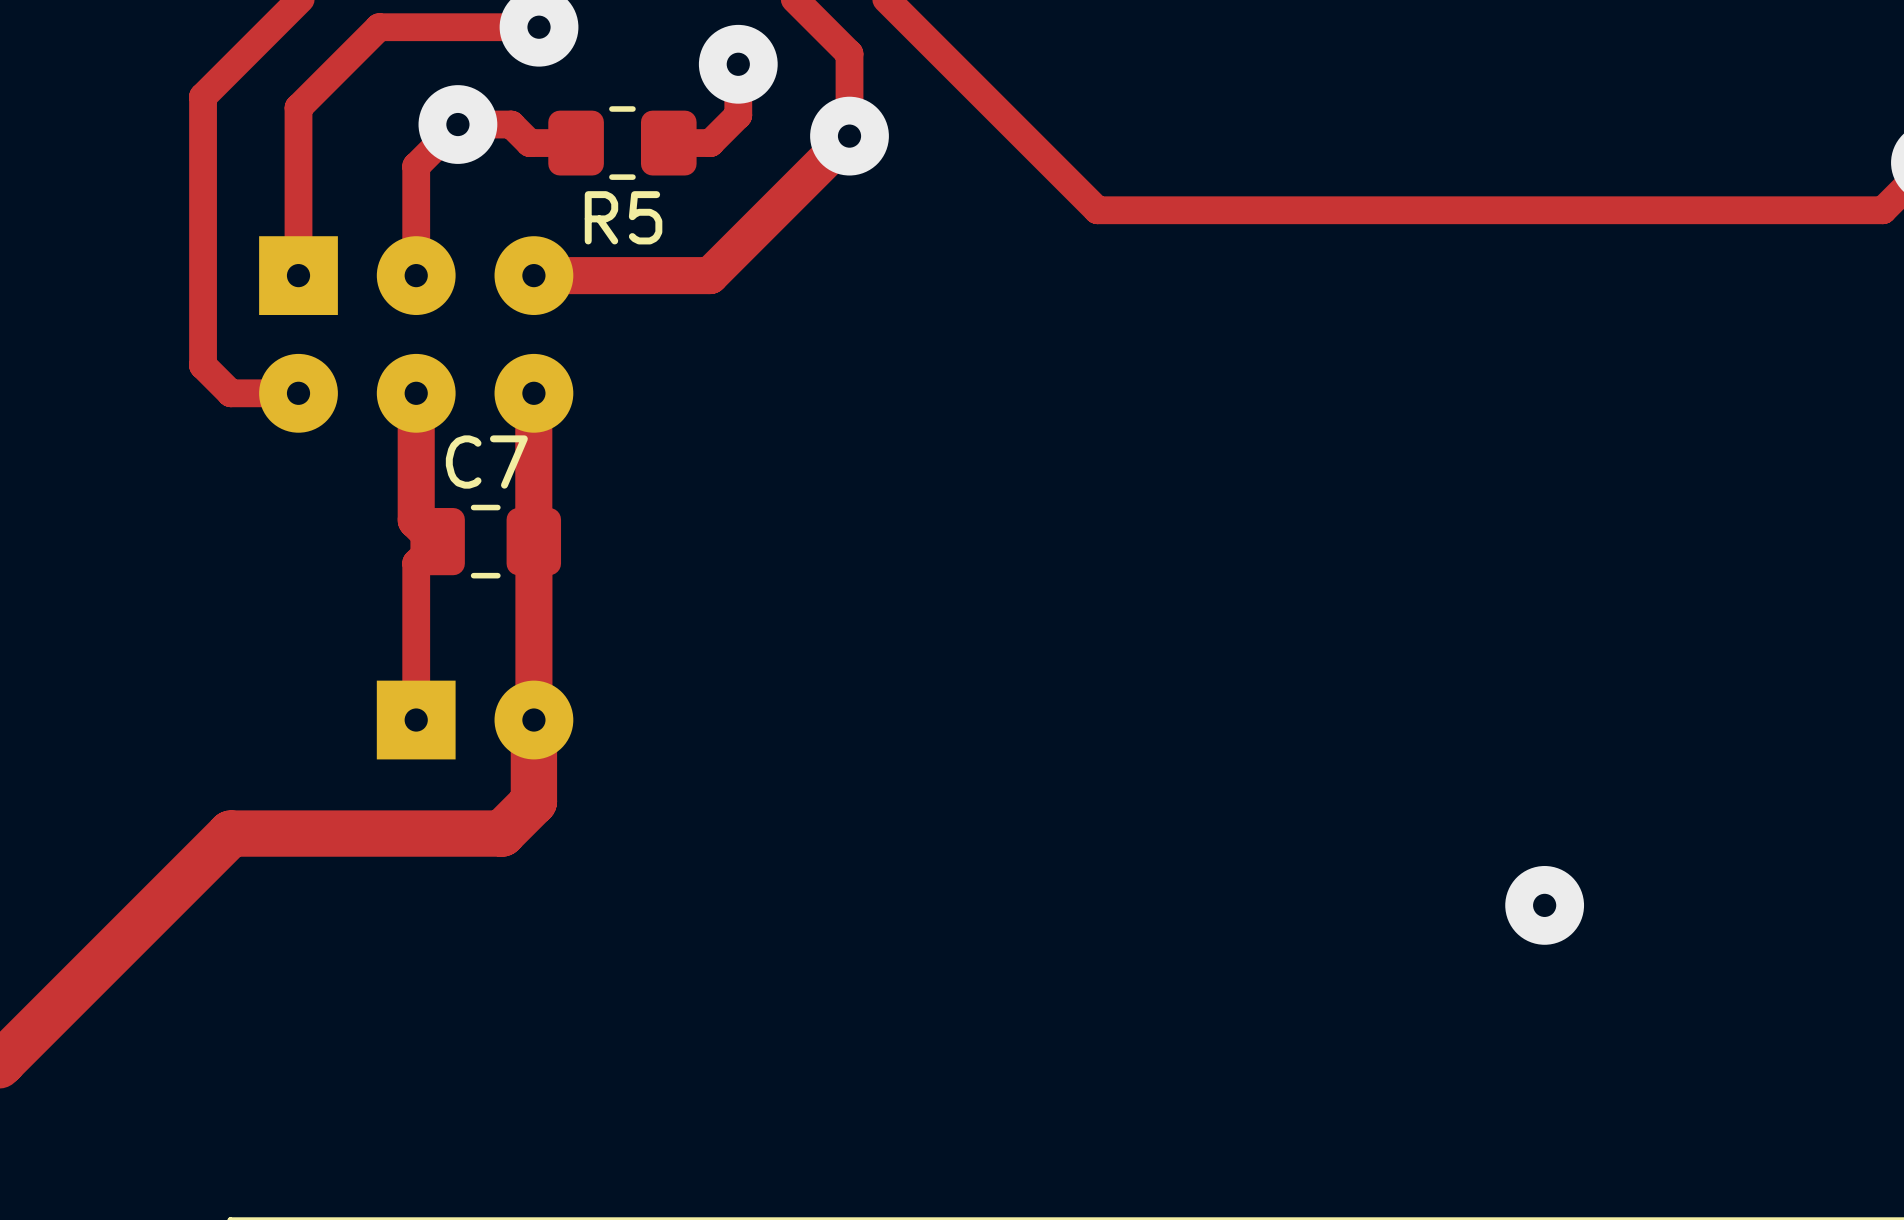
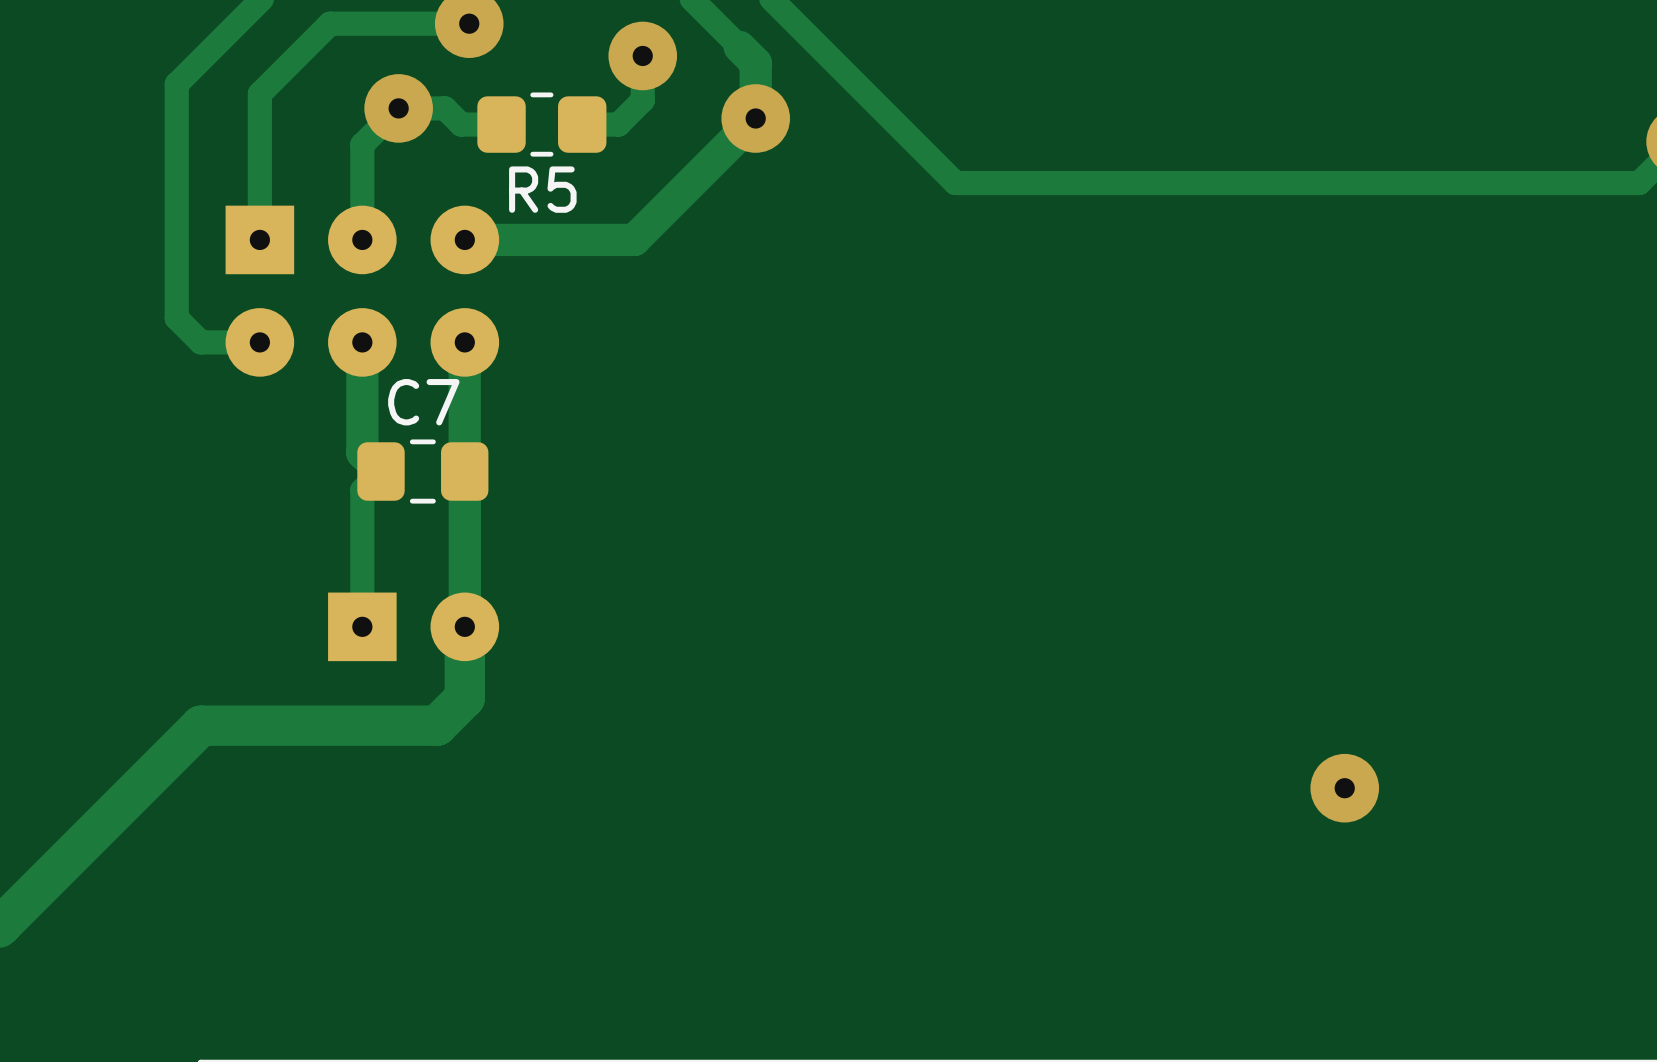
track: (849, 53) (849, 136) (710, 275) -> (739, 46) (755, 63) (755, 118) (634, 239) (618, 239)
via position: (849, 136) -> (755, 118)

